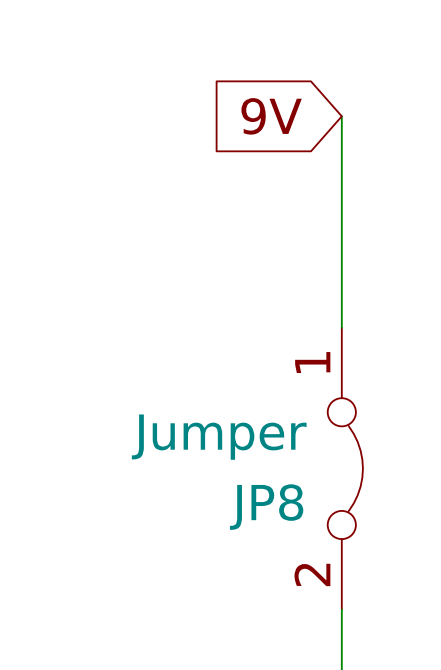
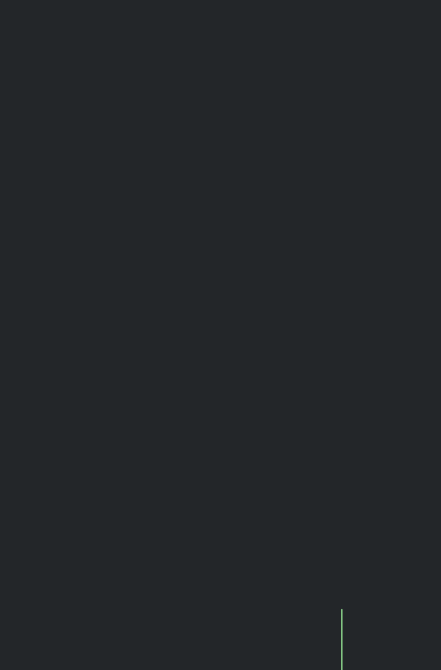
global label: 9V (271, 116) -> none
wire: (341, 116) (341, 327) -> none
JP8: Jumper (345, 468) -> none

